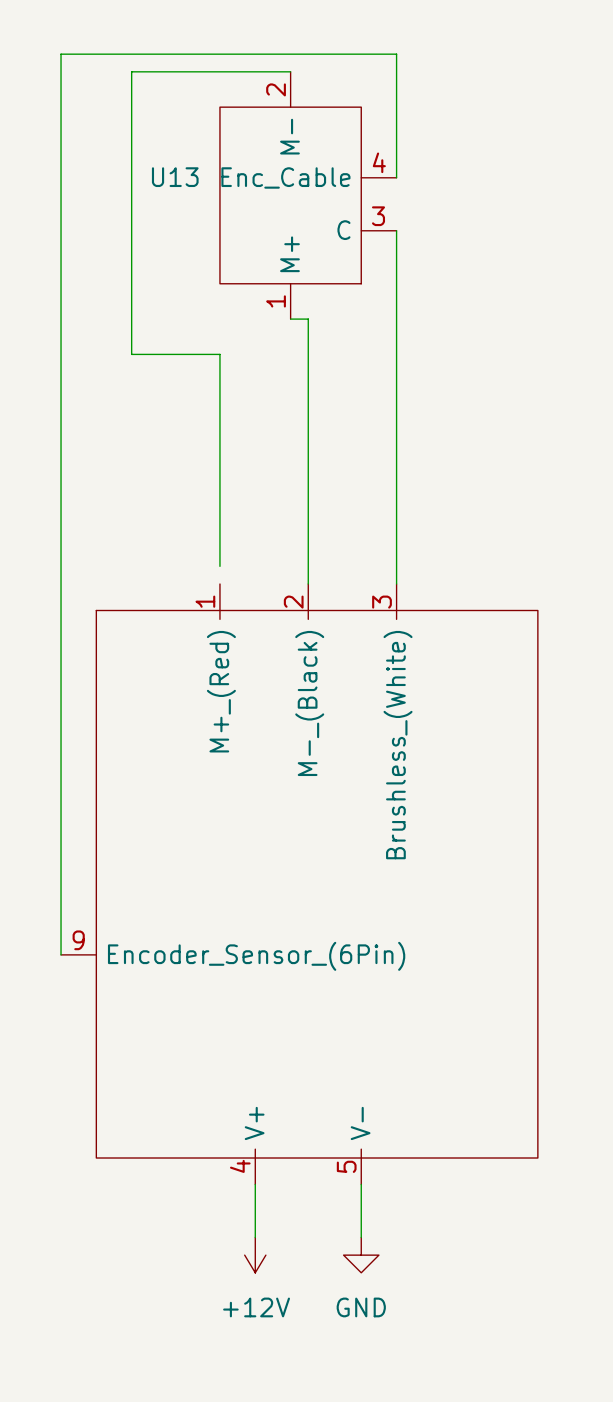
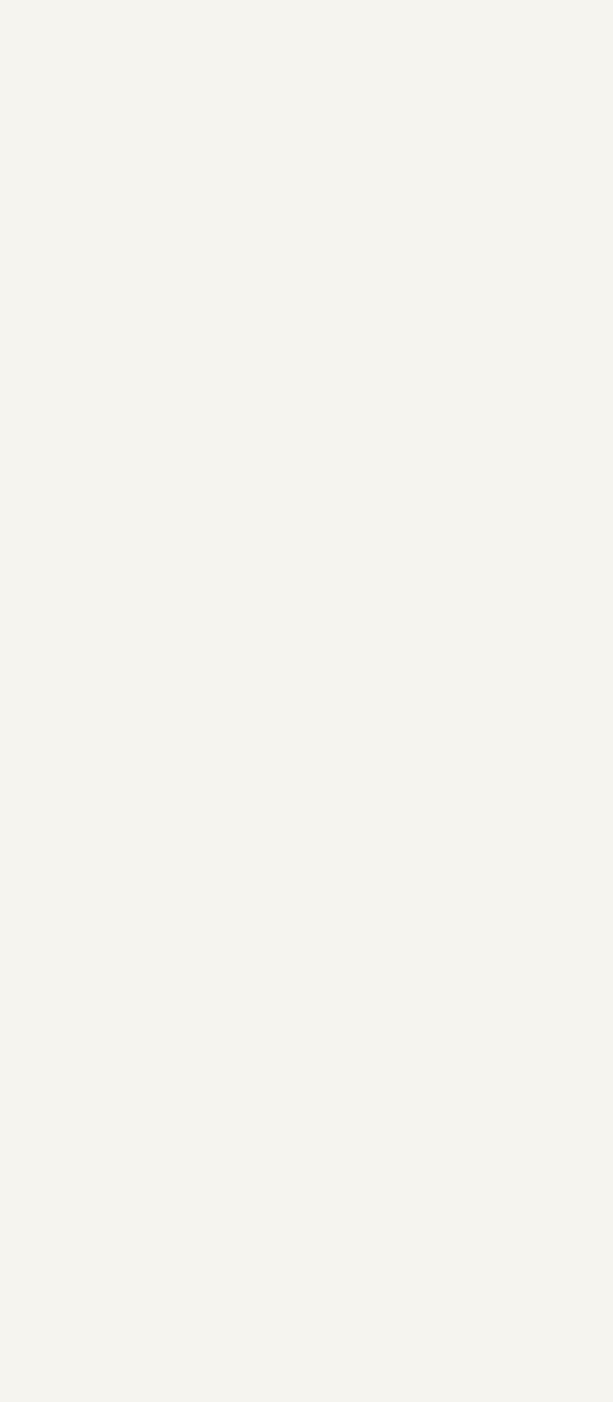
wire: (290, 71) (131, 71) (131, 354) (219, 354) (219, 566) -> none
wire: (396, 177) (396, 54) (61, 54) (61, 954) -> none
U13: (308, 195) -> none
wire: (396, 230) (396, 584) -> none
wire: (290, 319) (308, 319) (308, 584) -> none
part: (299, 884) -> none
wire: (255, 1184) (255, 1237) -> none
wire: (361, 1184) (361, 1237) -> none
power symbol: +12V (255, 1255) -> none
power symbol: GND (361, 1255) -> none

